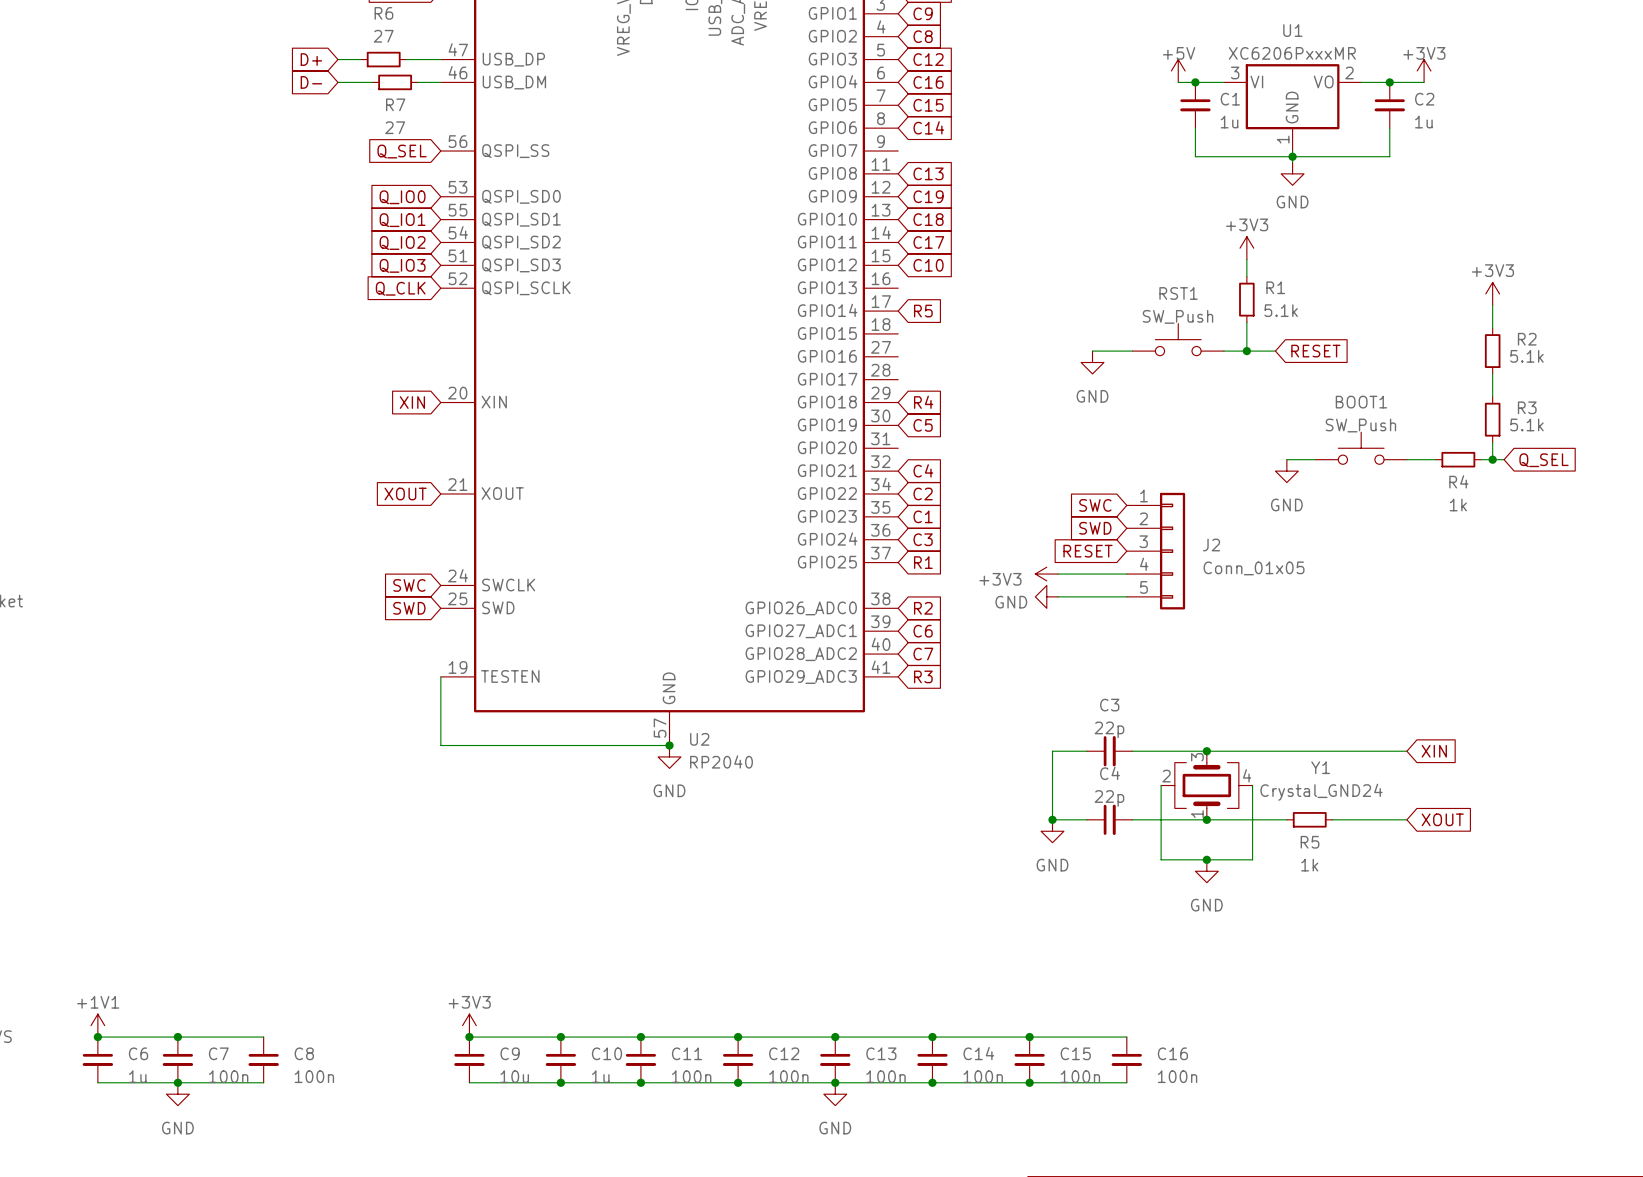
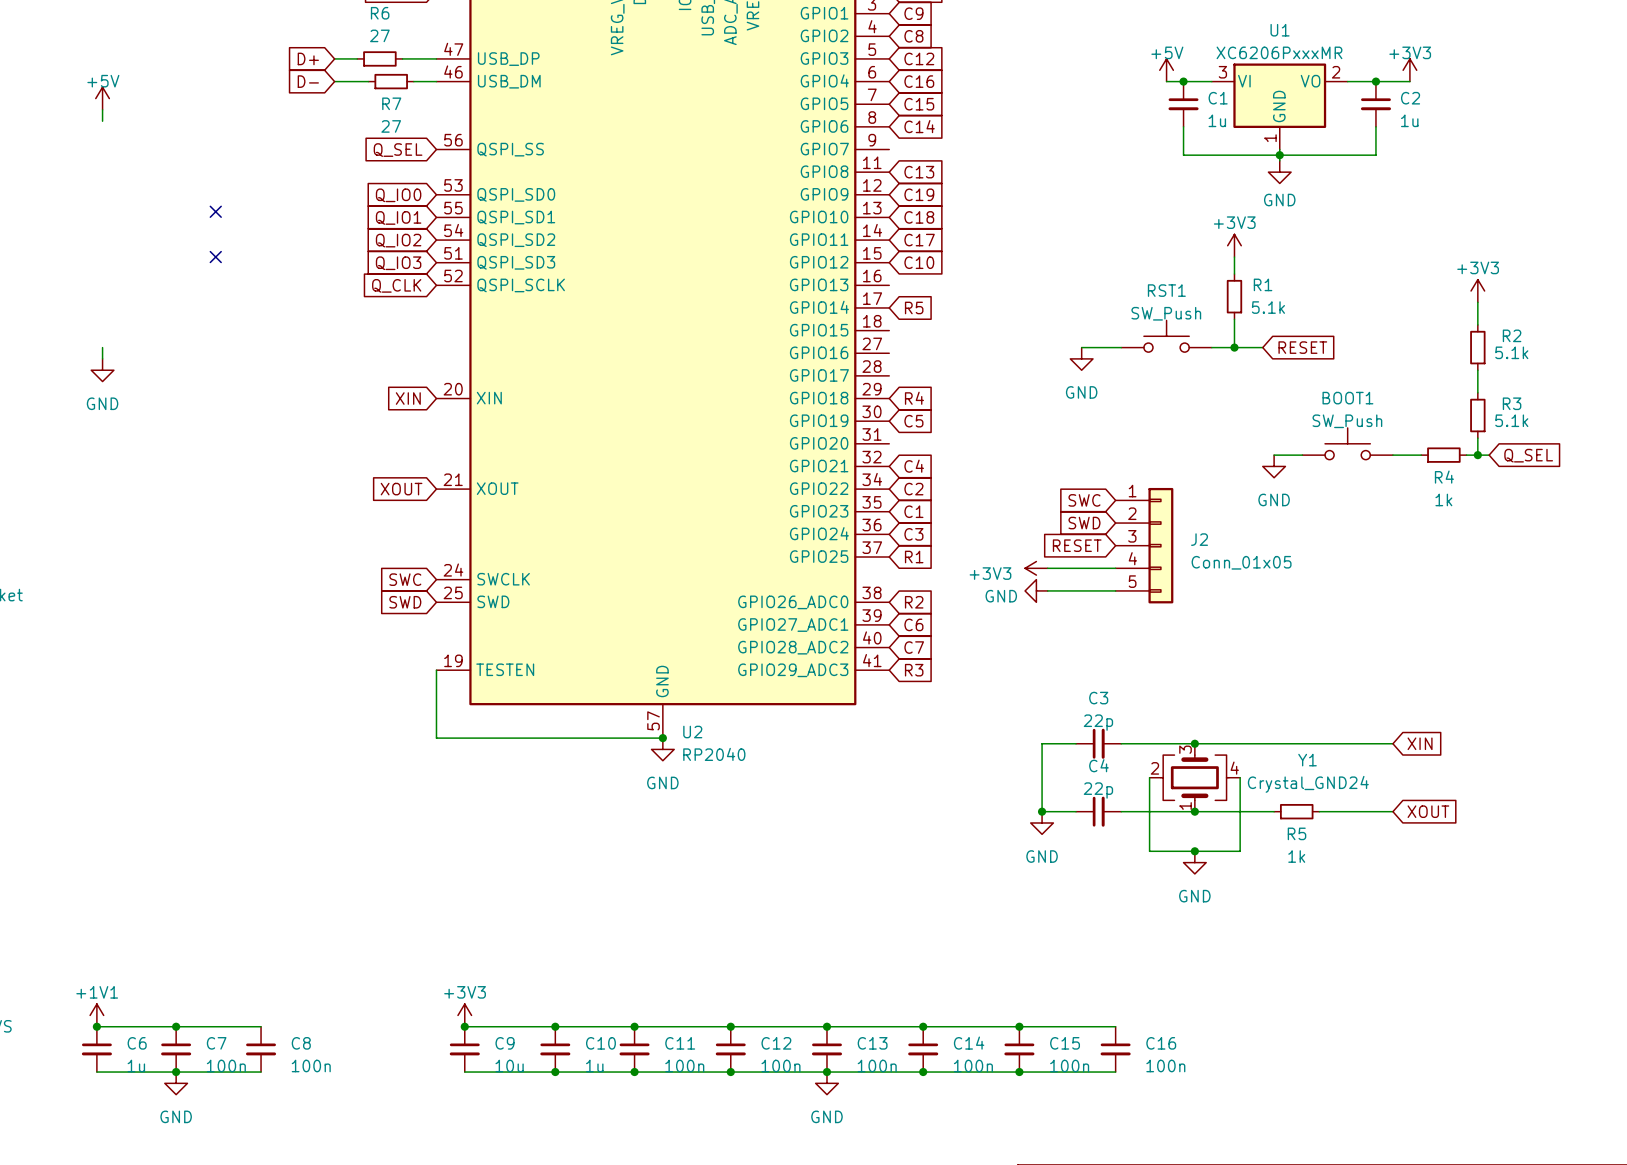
power symbol: none -> +5V (102, 98)
wire: none -> (102, 109) (102, 121)
no-connect mark: none -> (215, 211)
no-connect mark: none -> (215, 257)
wire: none -> (102, 347) (102, 358)
power symbol: none -> GND (102, 370)

